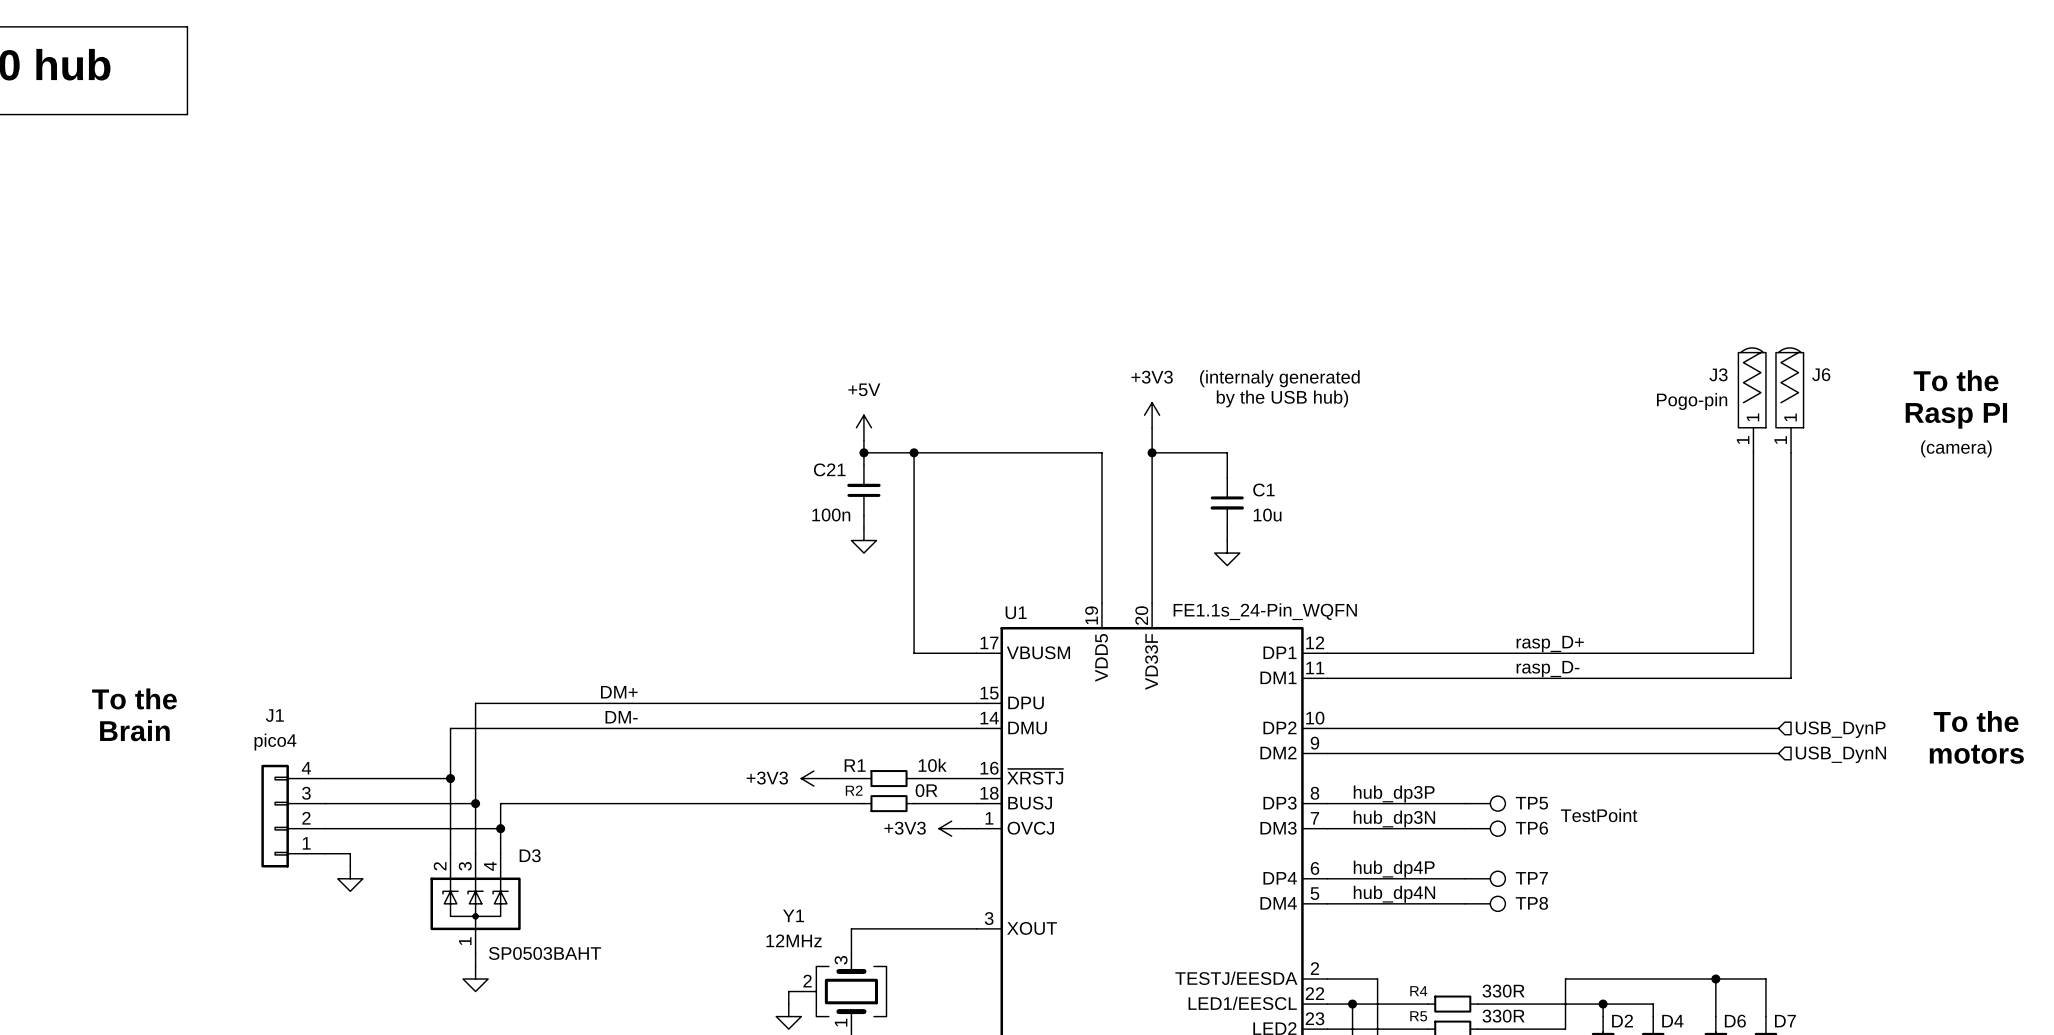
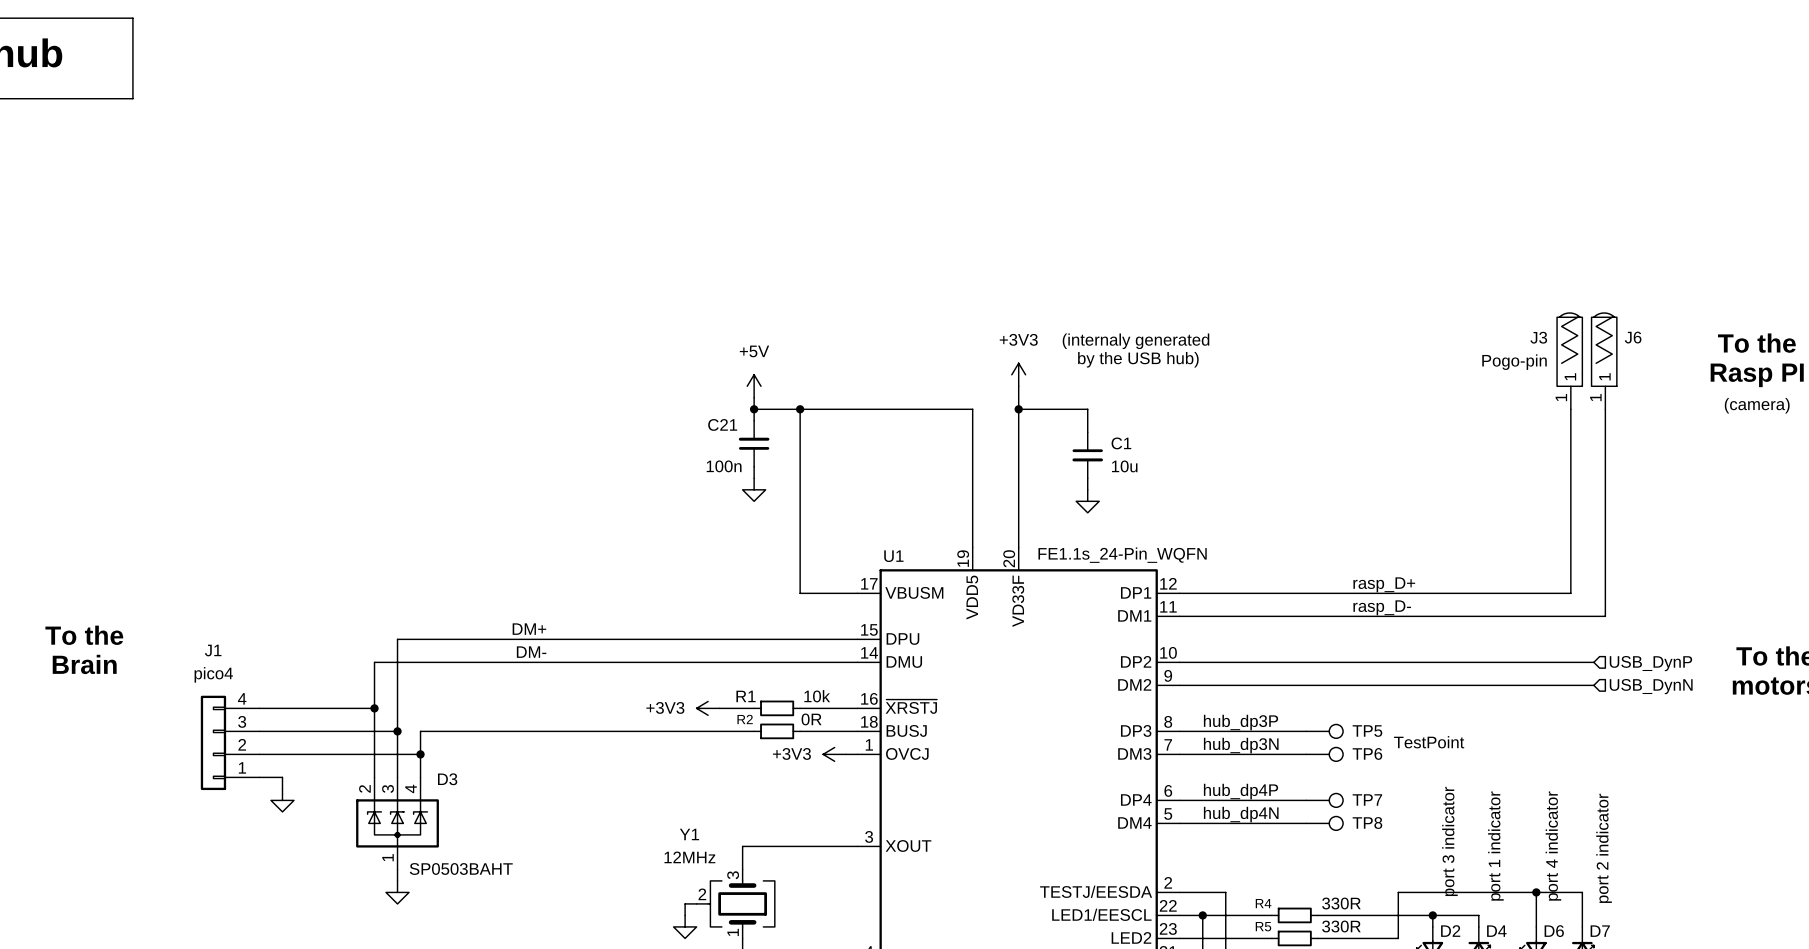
text: none -> port 3 indicator (1449, 841)
text: none -> port 1 indicator (1495, 846)
text: none -> port 4 indicator (1553, 846)
text: none -> port 2 indicator (1604, 848)

